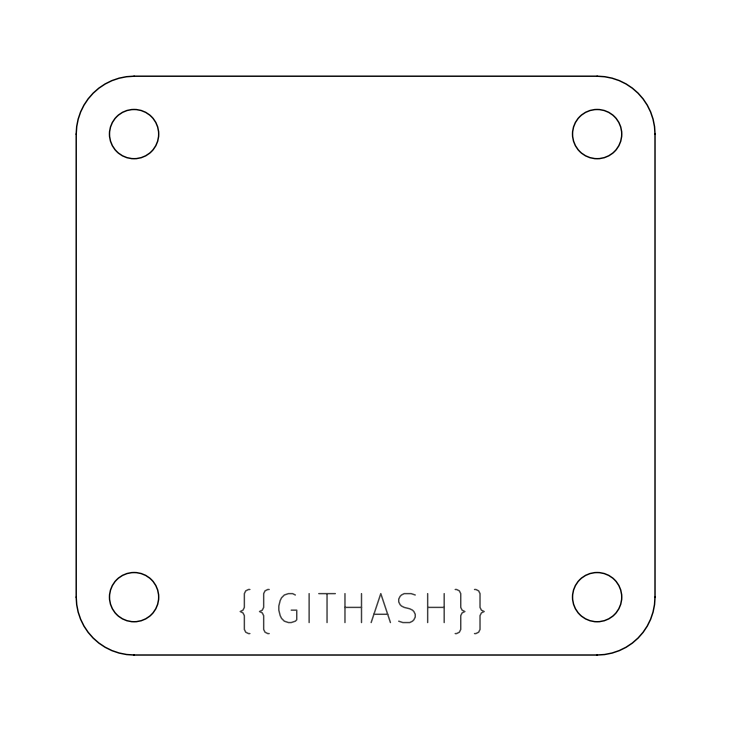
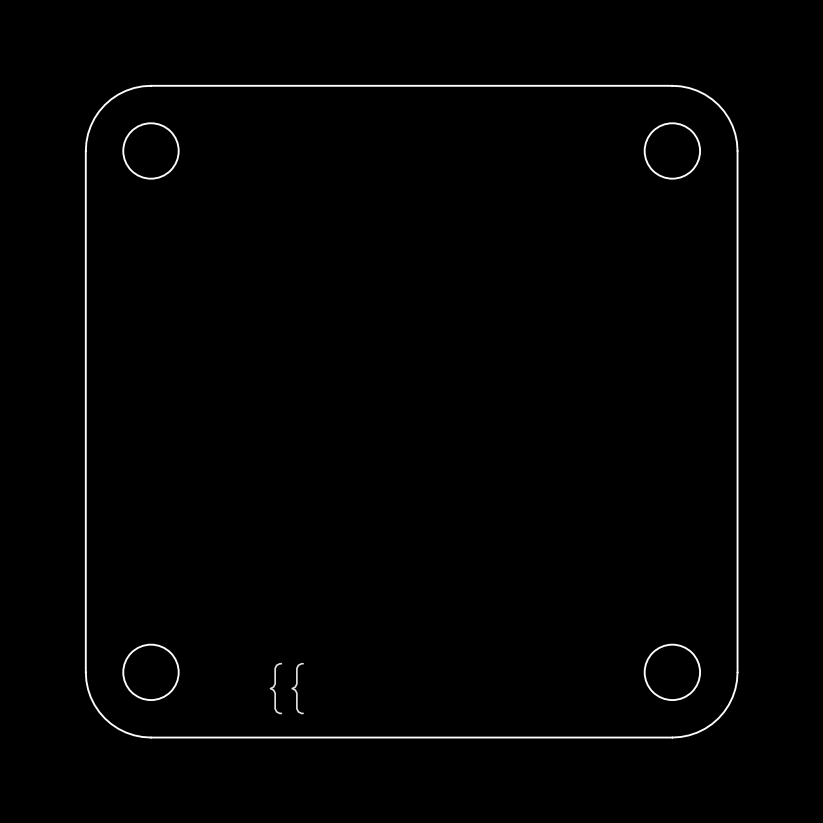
text: {{GITHASH}} (362, 611) -> {{ (286, 688)

